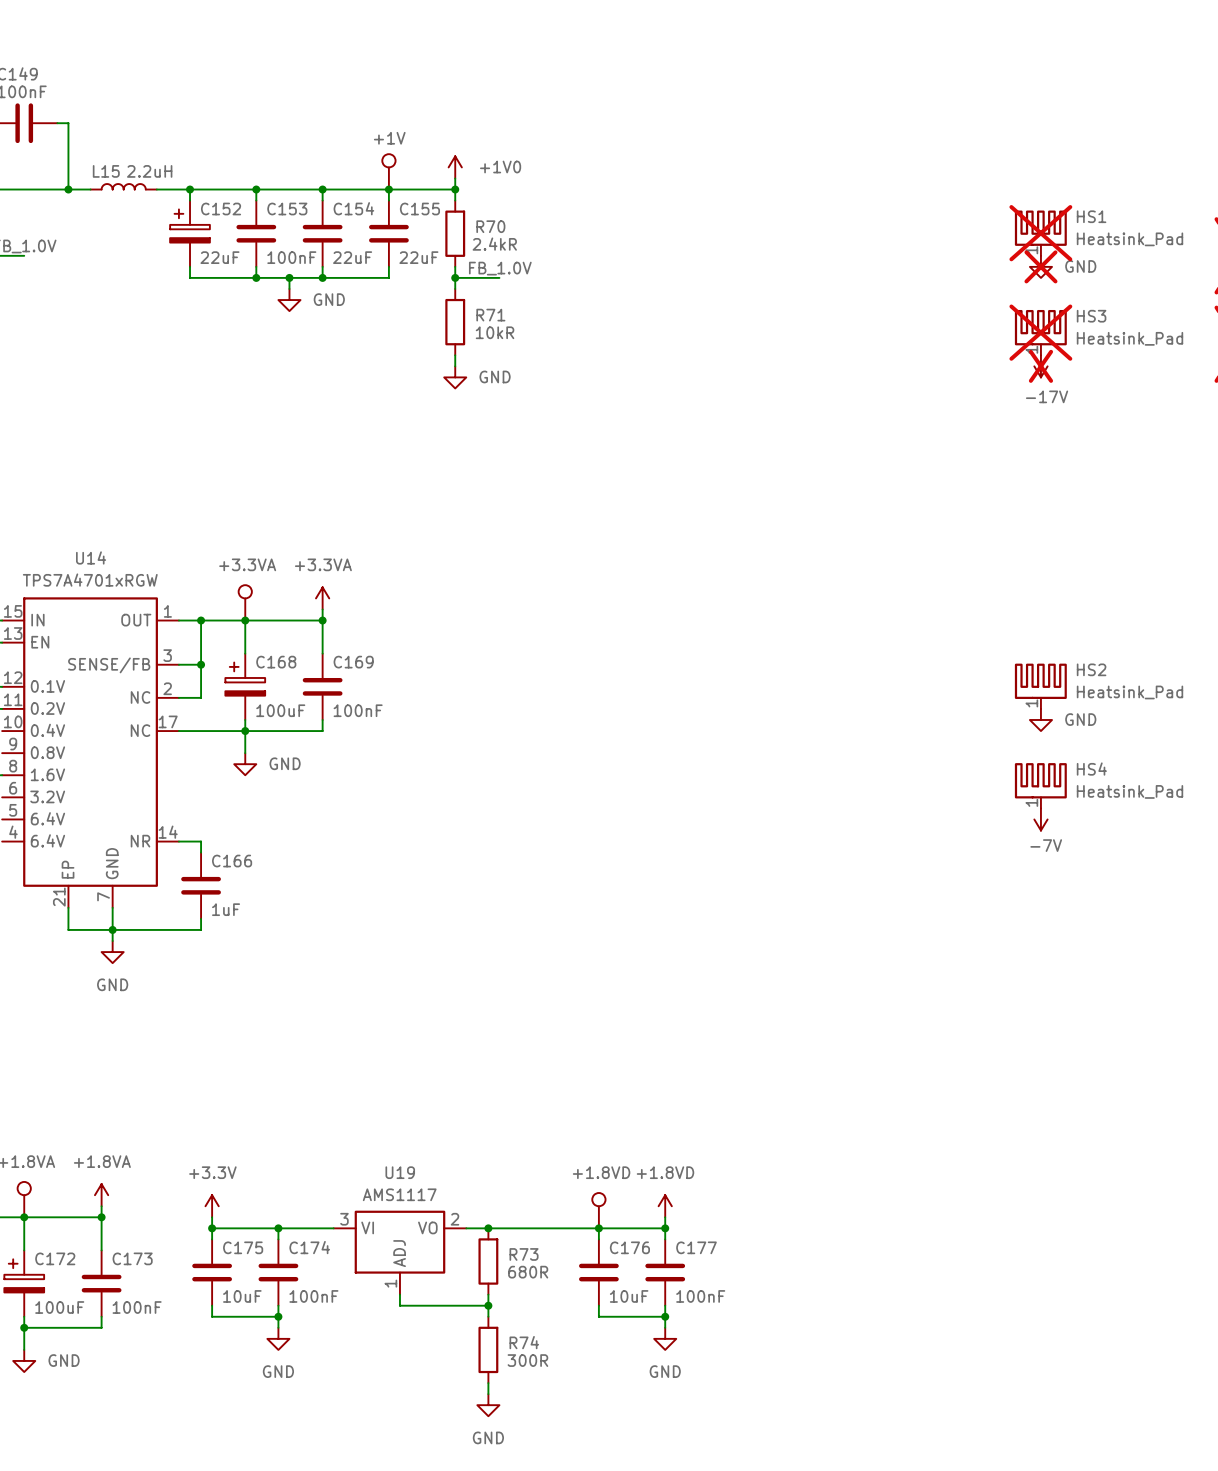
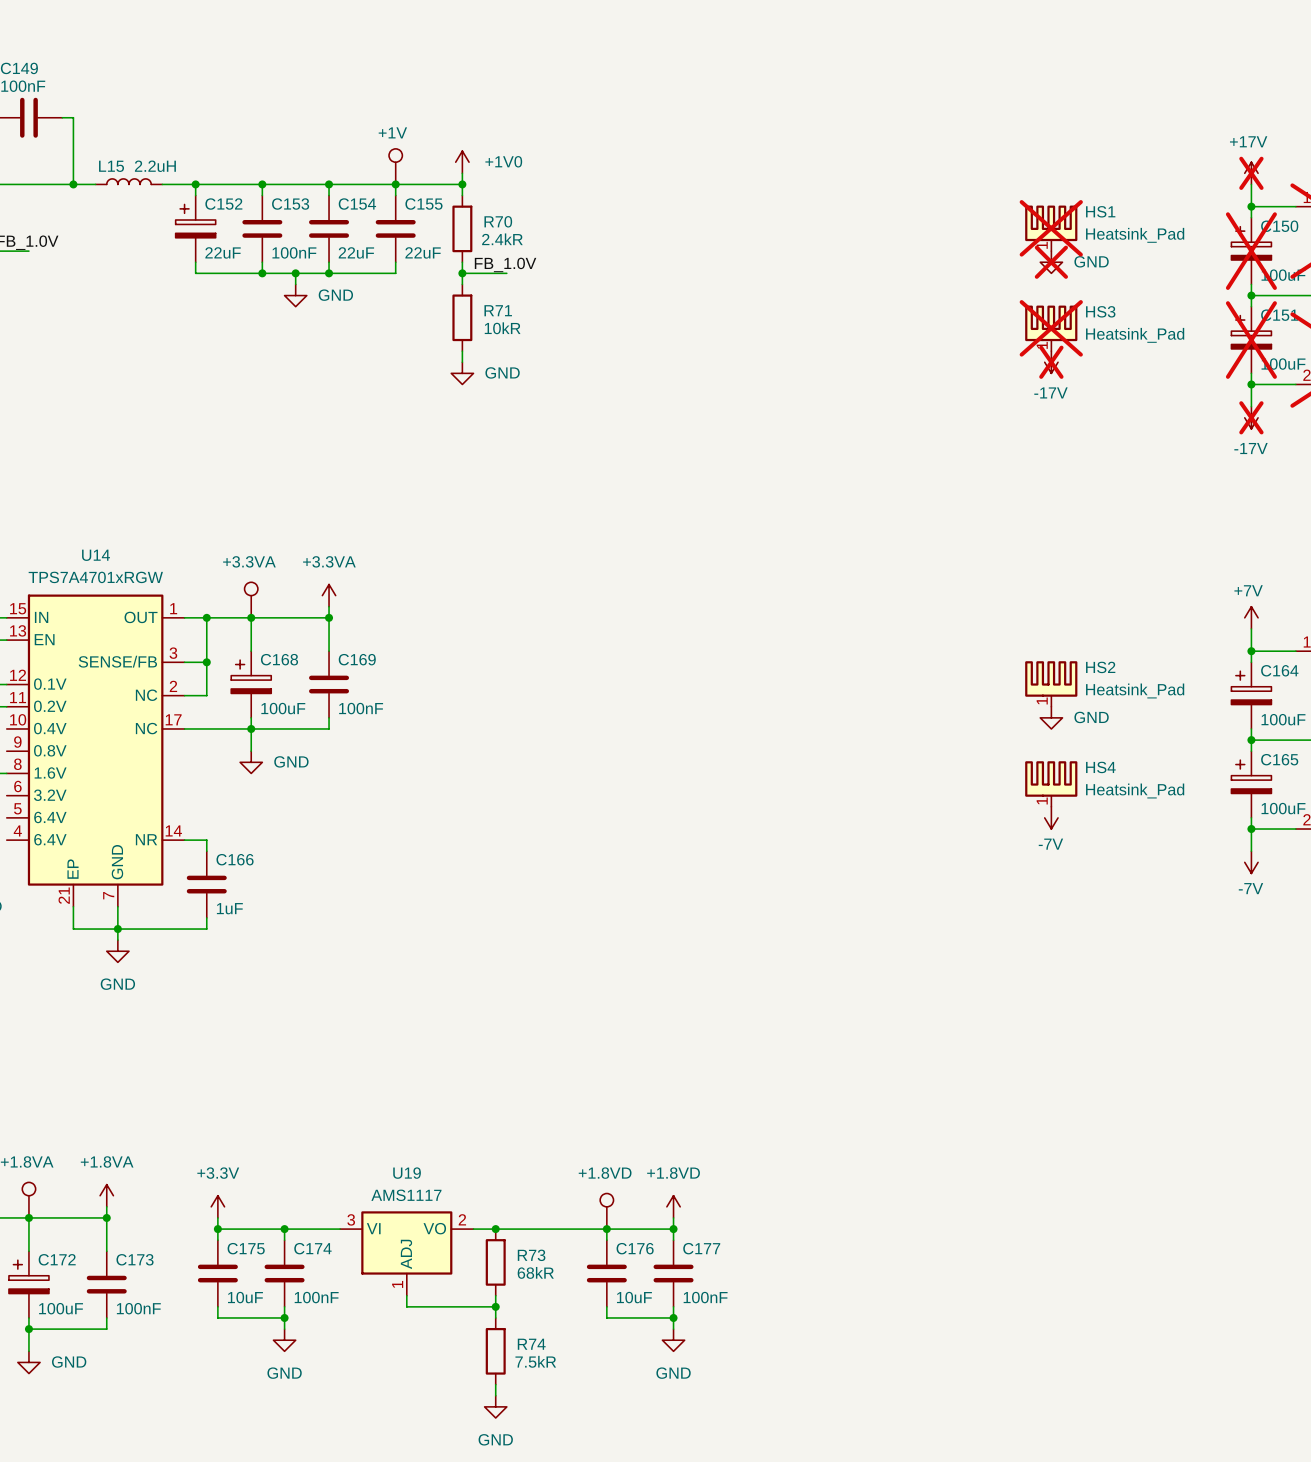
R73 value: 680R (528, 1272) -> 68kR (535, 1272)
R74 value: 300R (527, 1360) -> 7.5kR (535, 1361)

